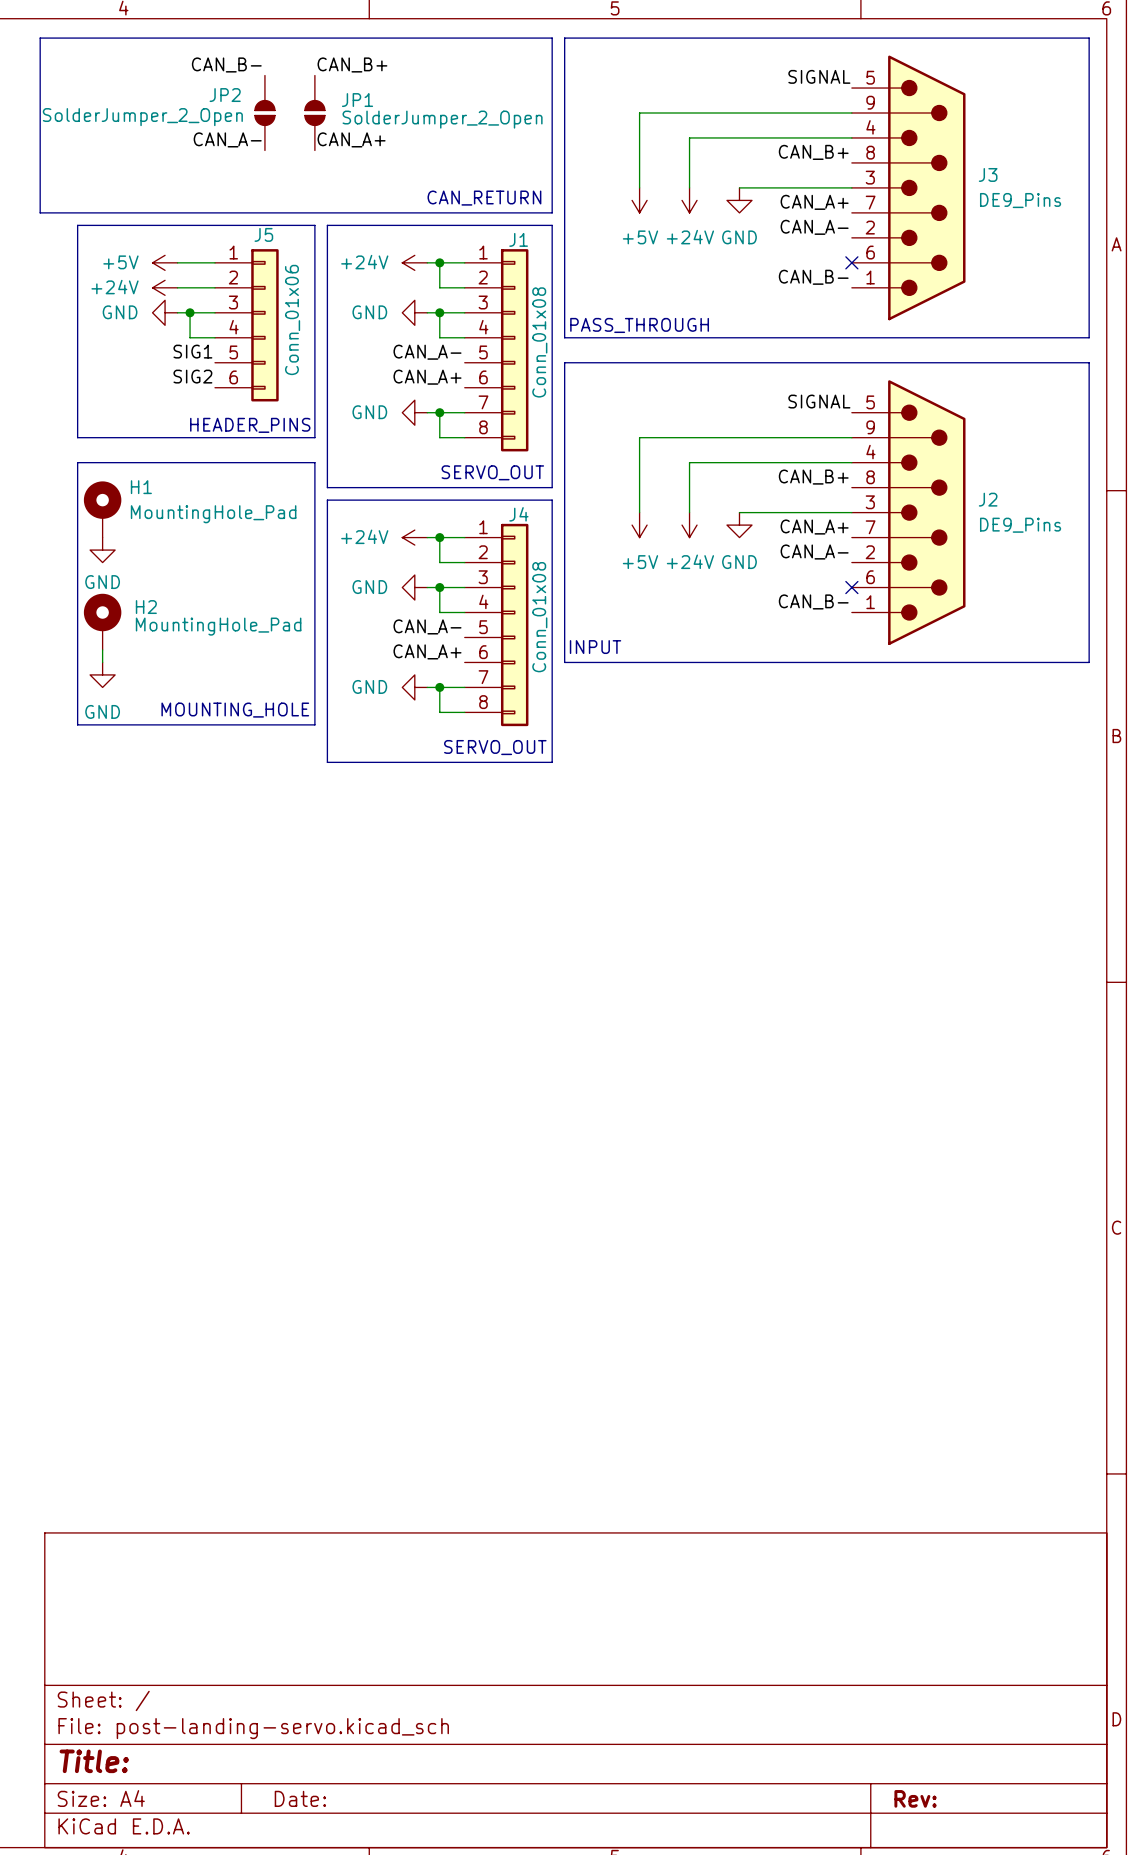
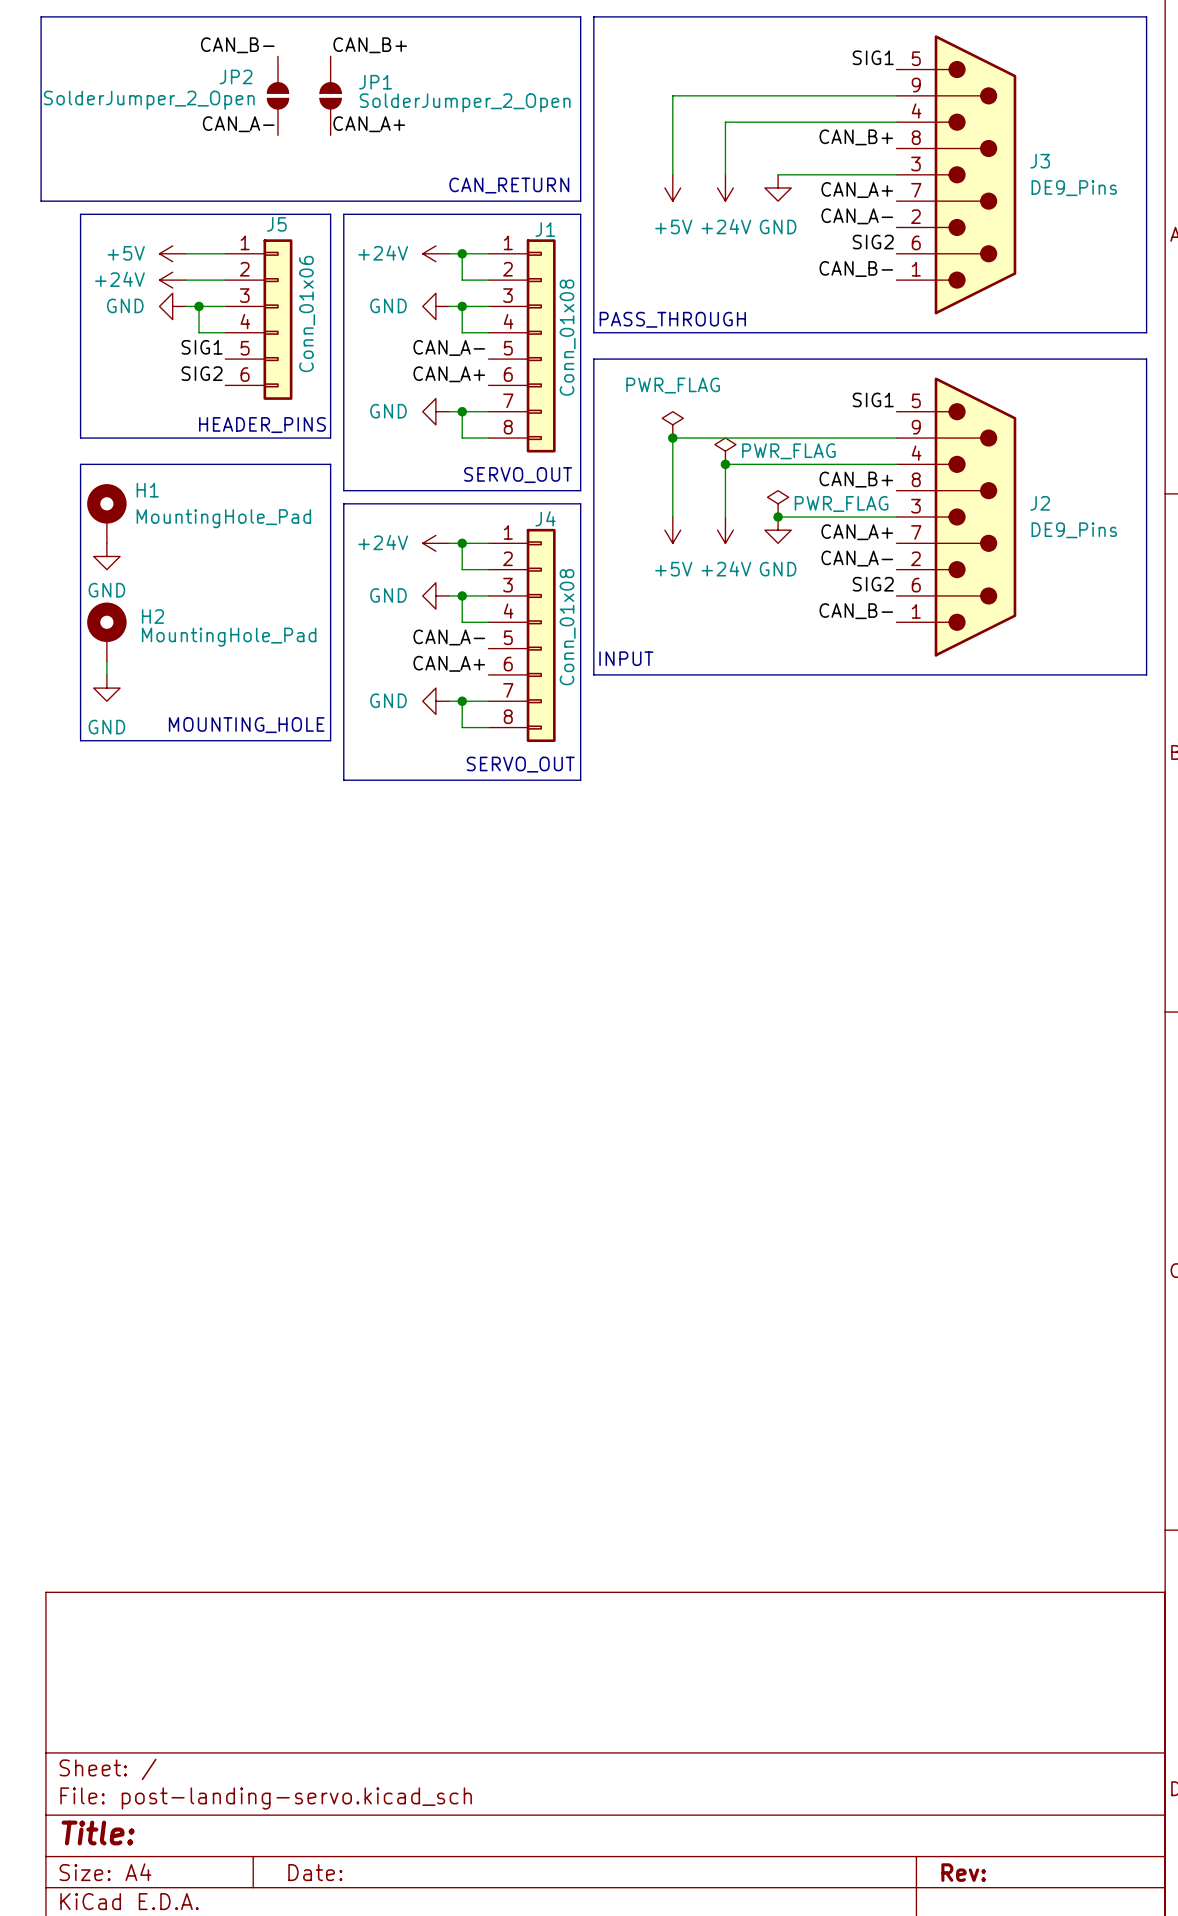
label: SIGNAL (819, 76) -> SIG1 (873, 57)
label: none -> SIG2 (873, 242)
no-connect mark: (851, 262) -> none
label: SIGNAL (819, 401) -> SIG1 (873, 399)
power symbol: none -> PWR_FLAG (672, 424)
junction: none -> (672, 438)
power symbol: none -> PWR_FLAG (725, 451)
junction: none -> (725, 464)
power symbol: none -> PWR_FLAG (778, 503)
junction: none -> (778, 517)
label: none -> SIG2 (873, 584)
no-connect mark: (851, 587) -> none

